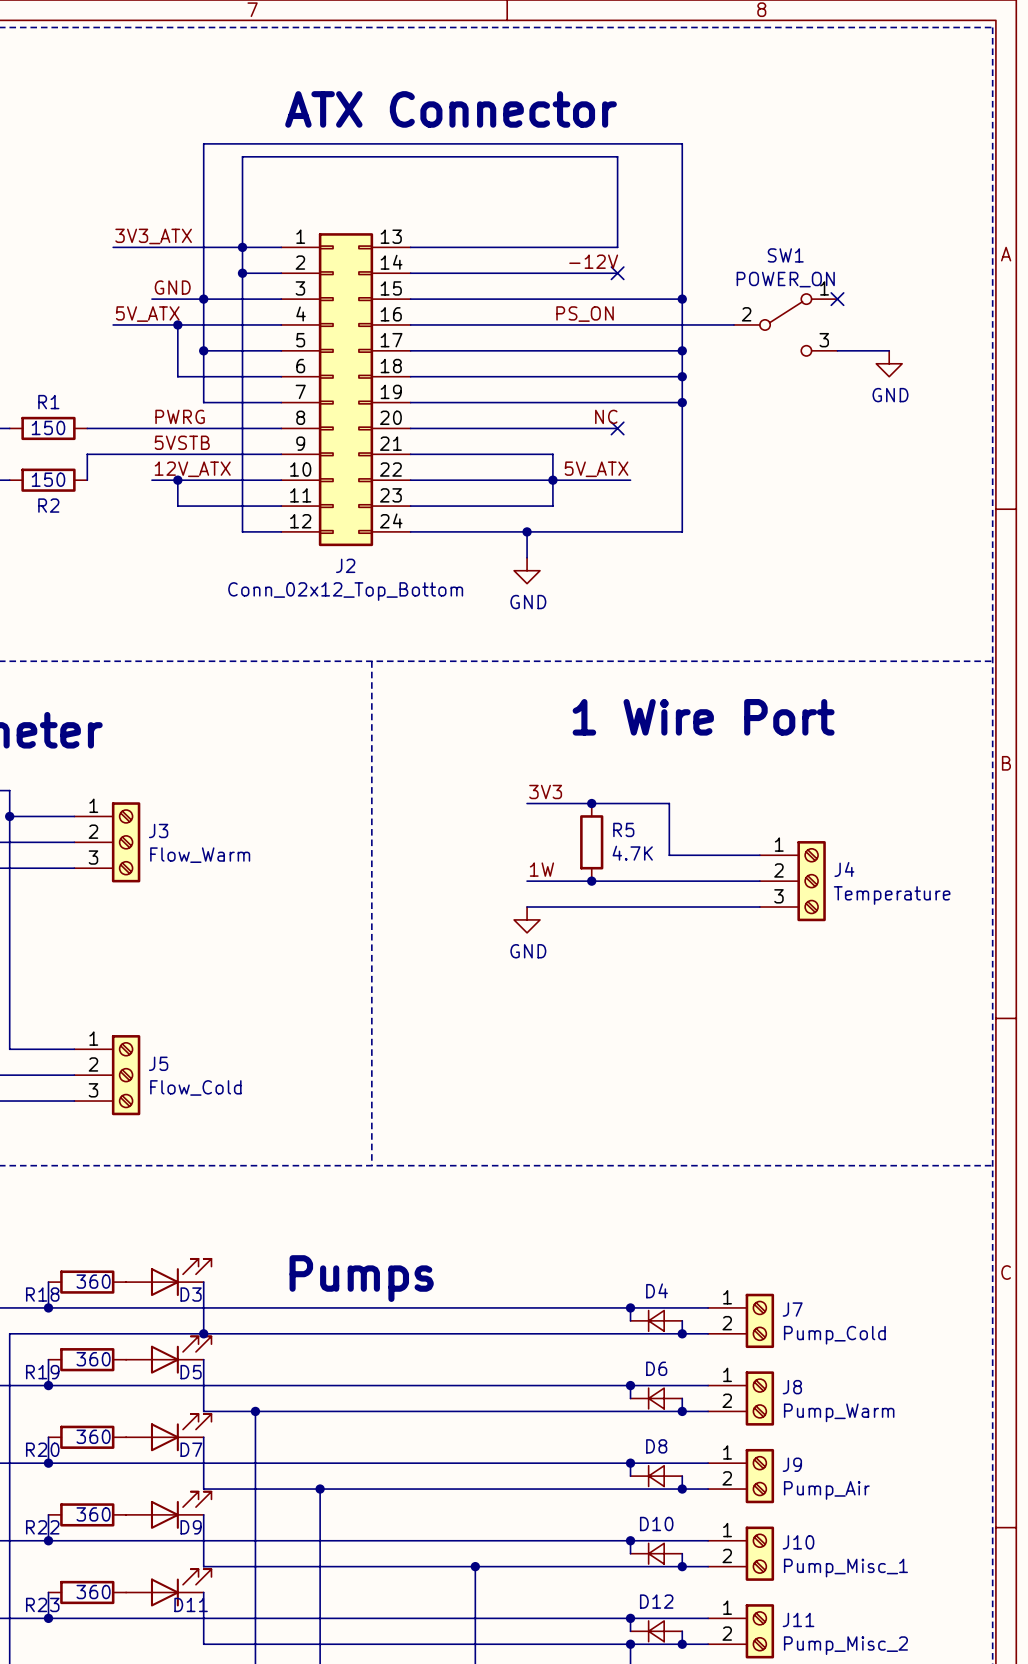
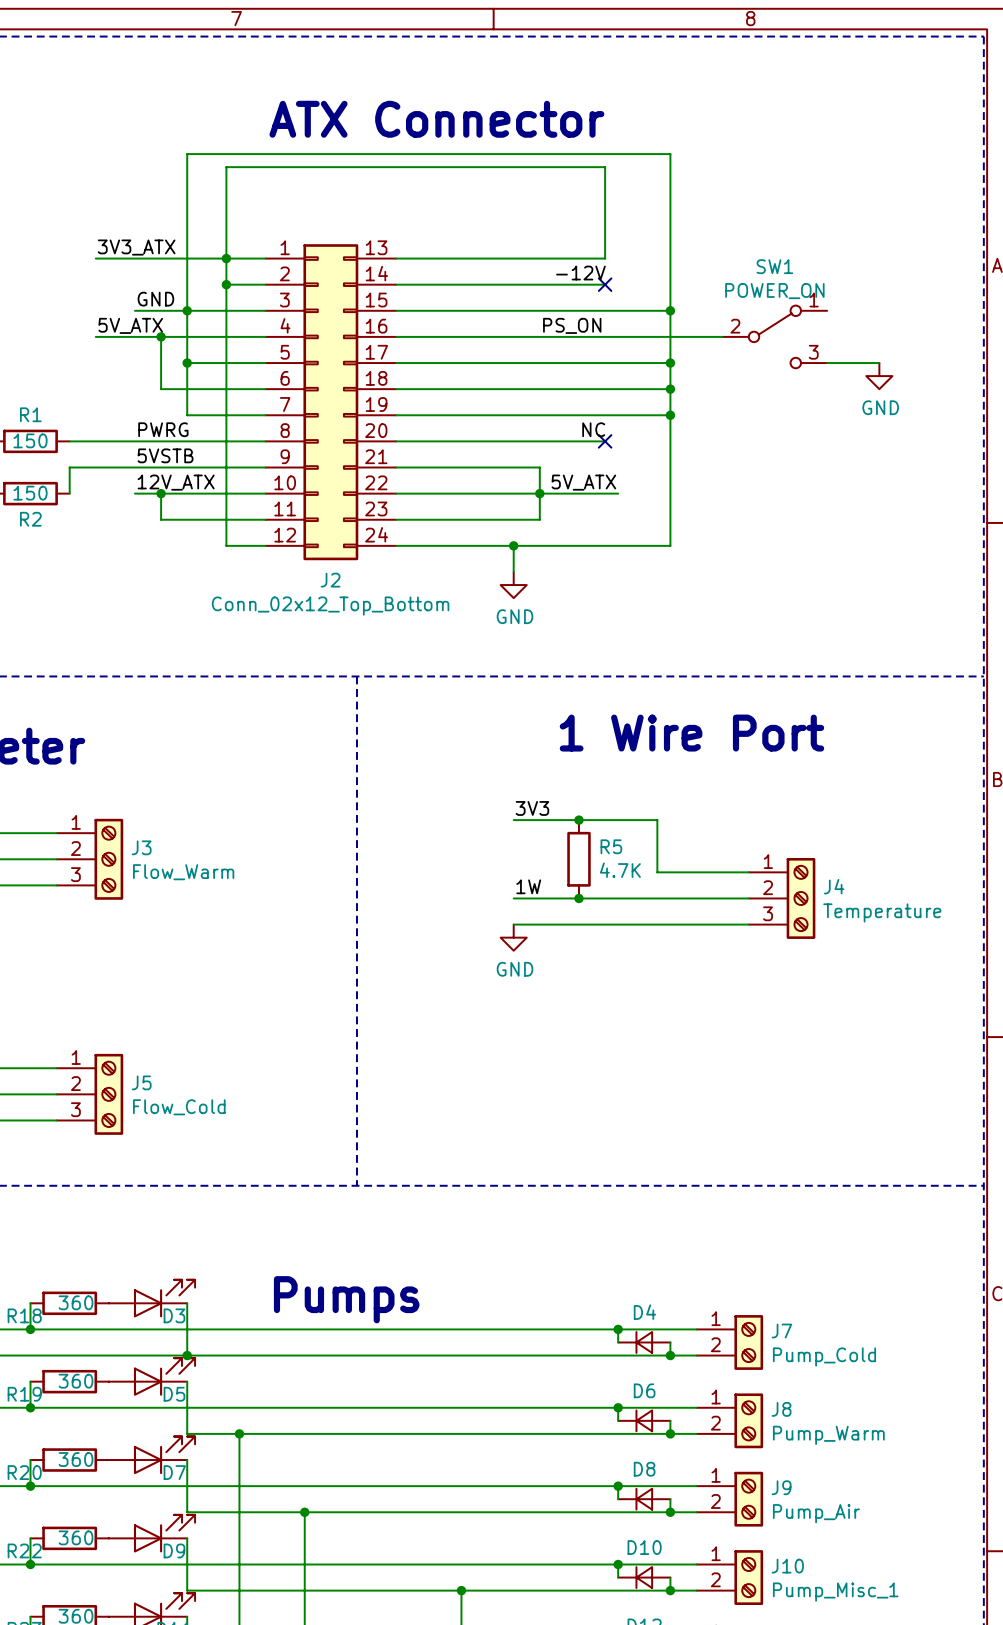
no-connect mark: (837, 299) -> none

